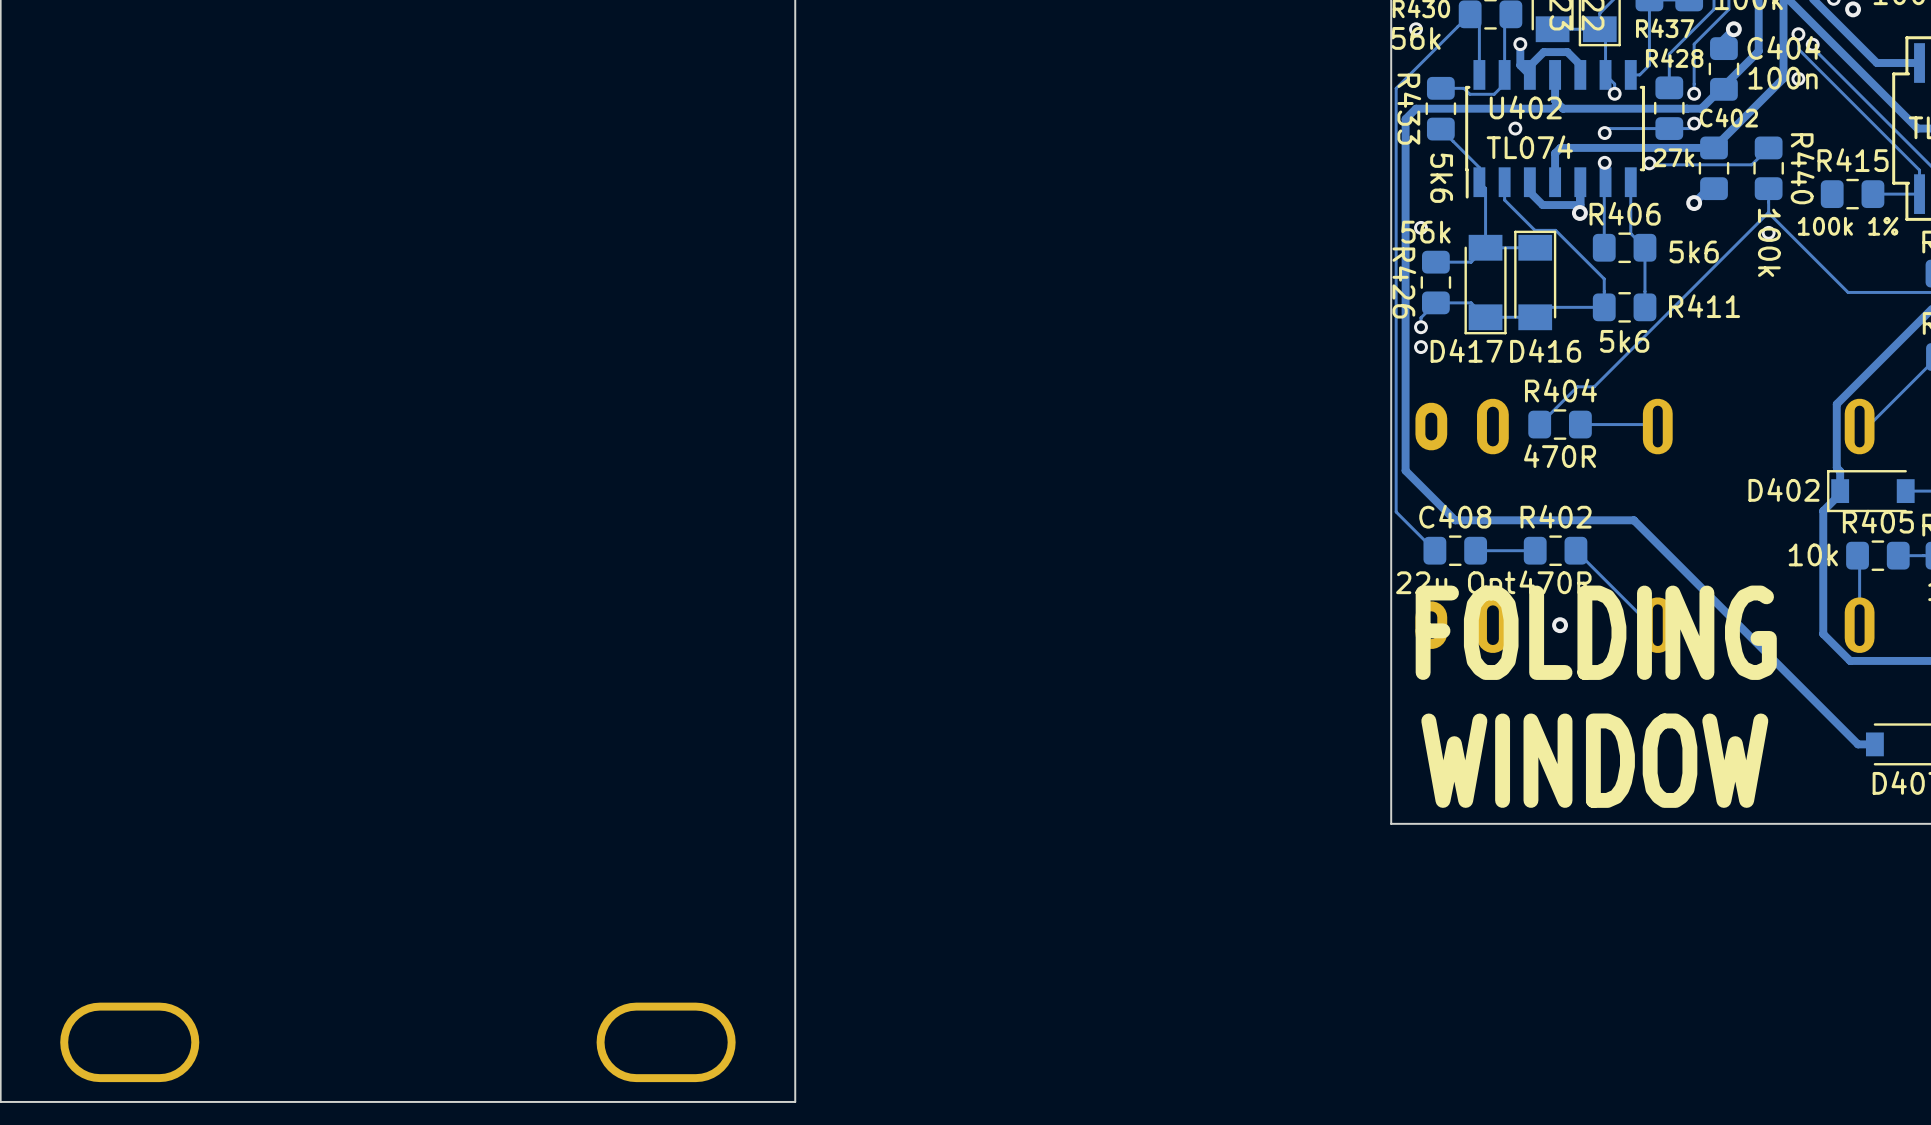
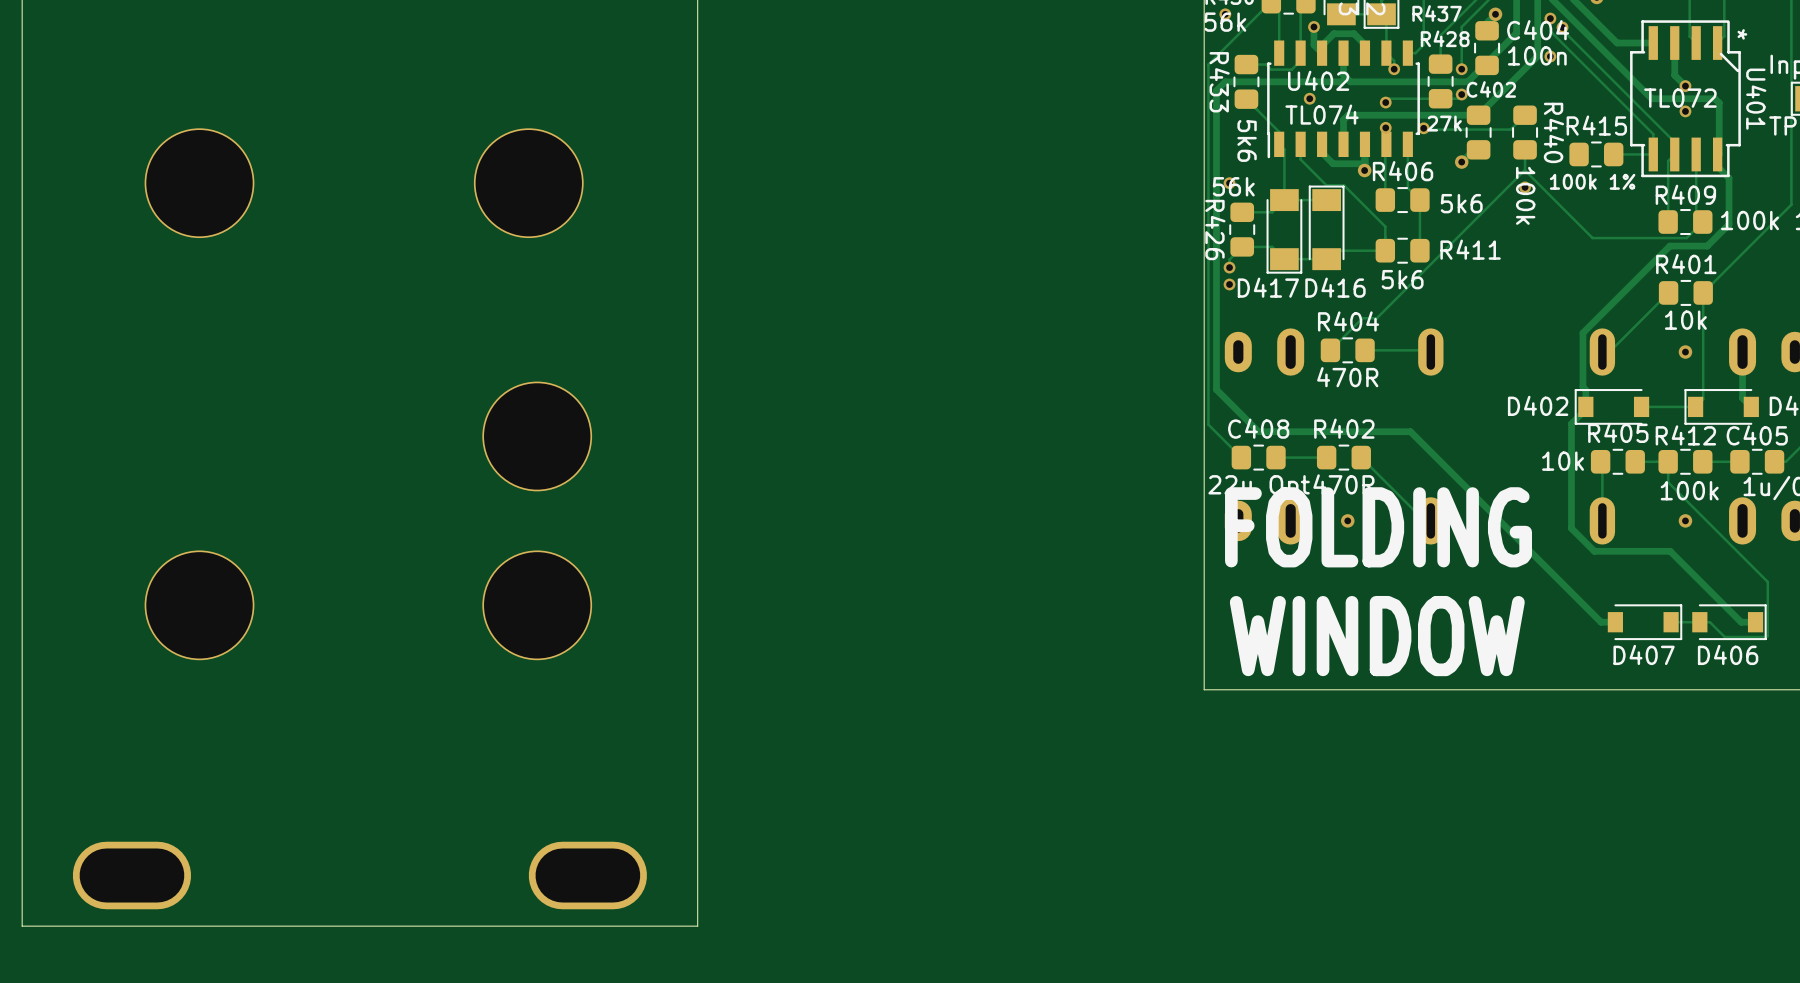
part: none -> (199, 183)
part: none -> (528, 183)
part: none -> (537, 436)
part: none -> (199, 605)
part: none -> (537, 605)

